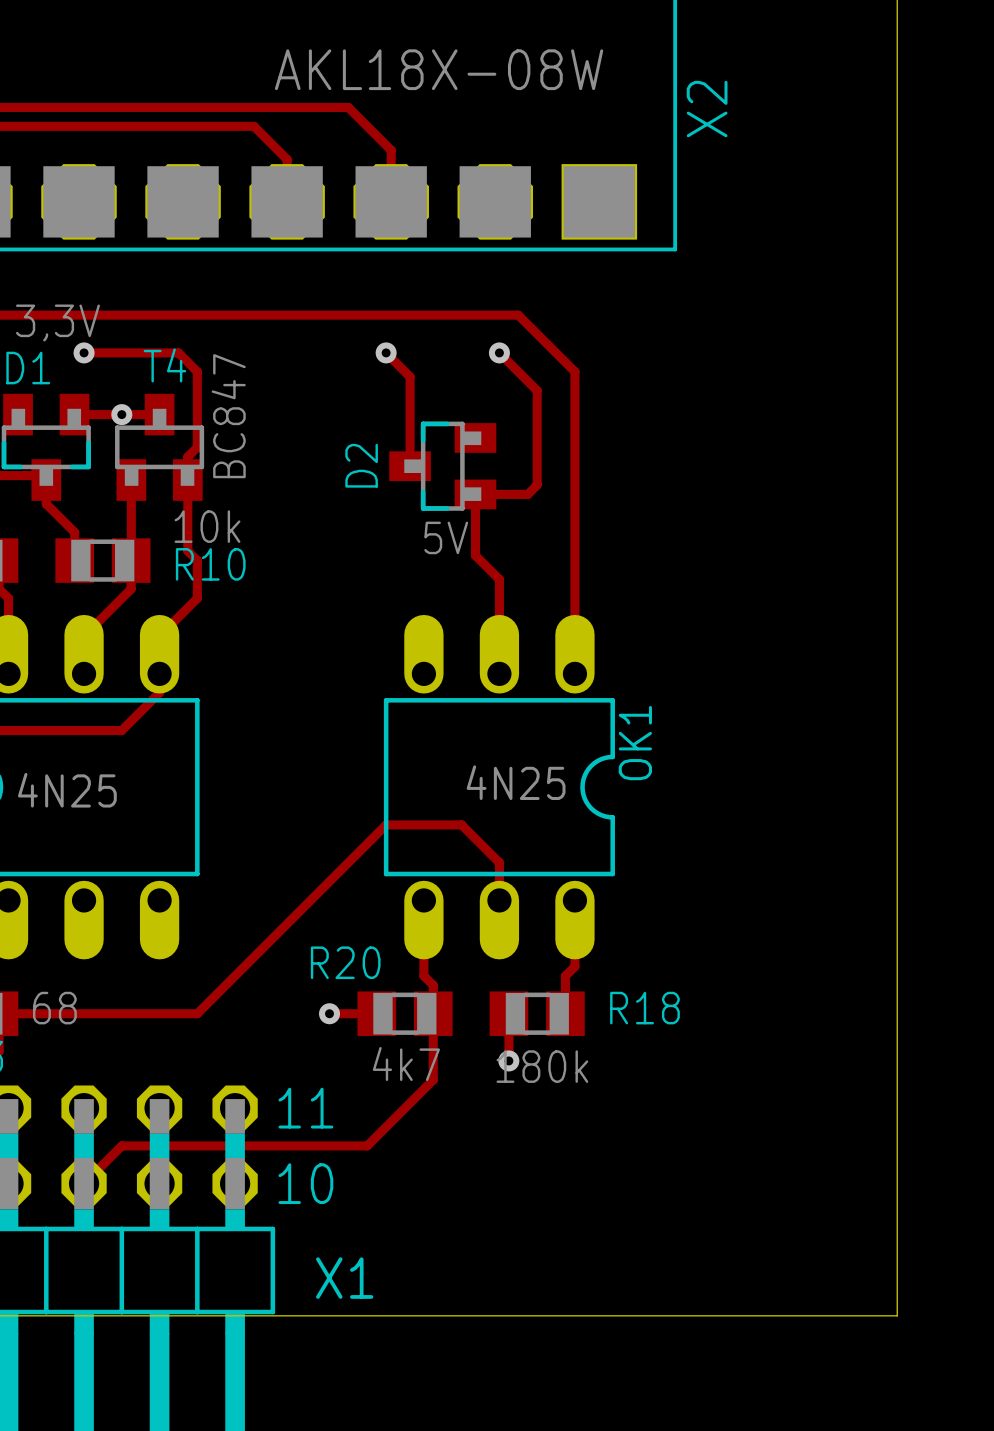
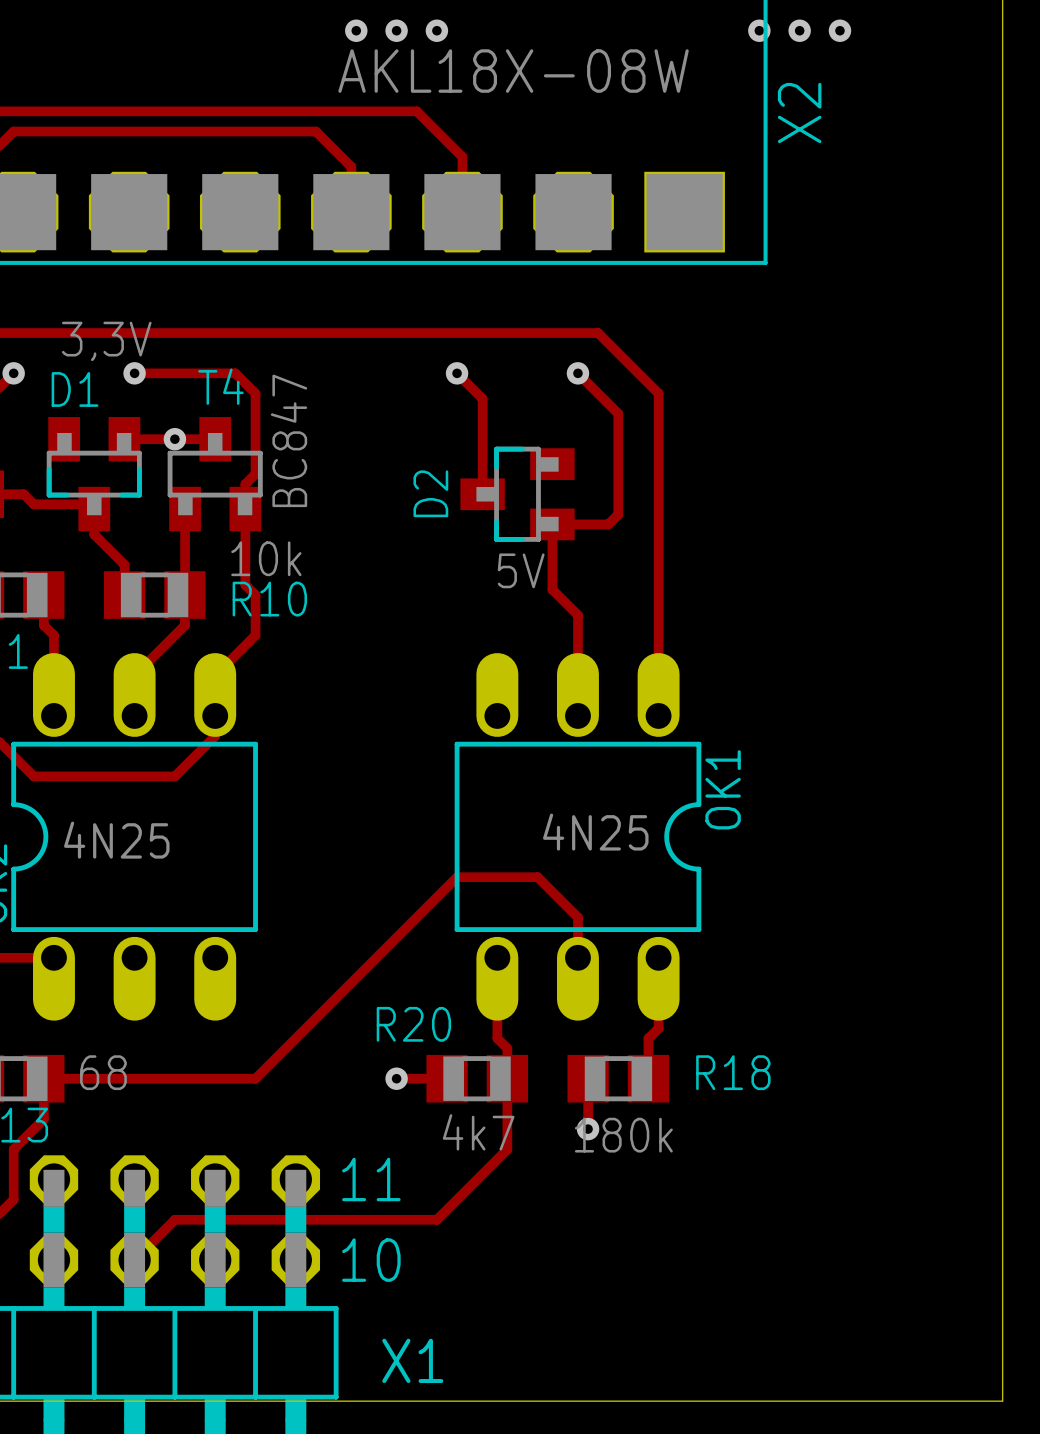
via: none -> (356, 30)
via: none -> (396, 30)
via: none -> (436, 30)
via: none -> (759, 30)
via: none -> (799, 30)
via: none -> (839, 30)

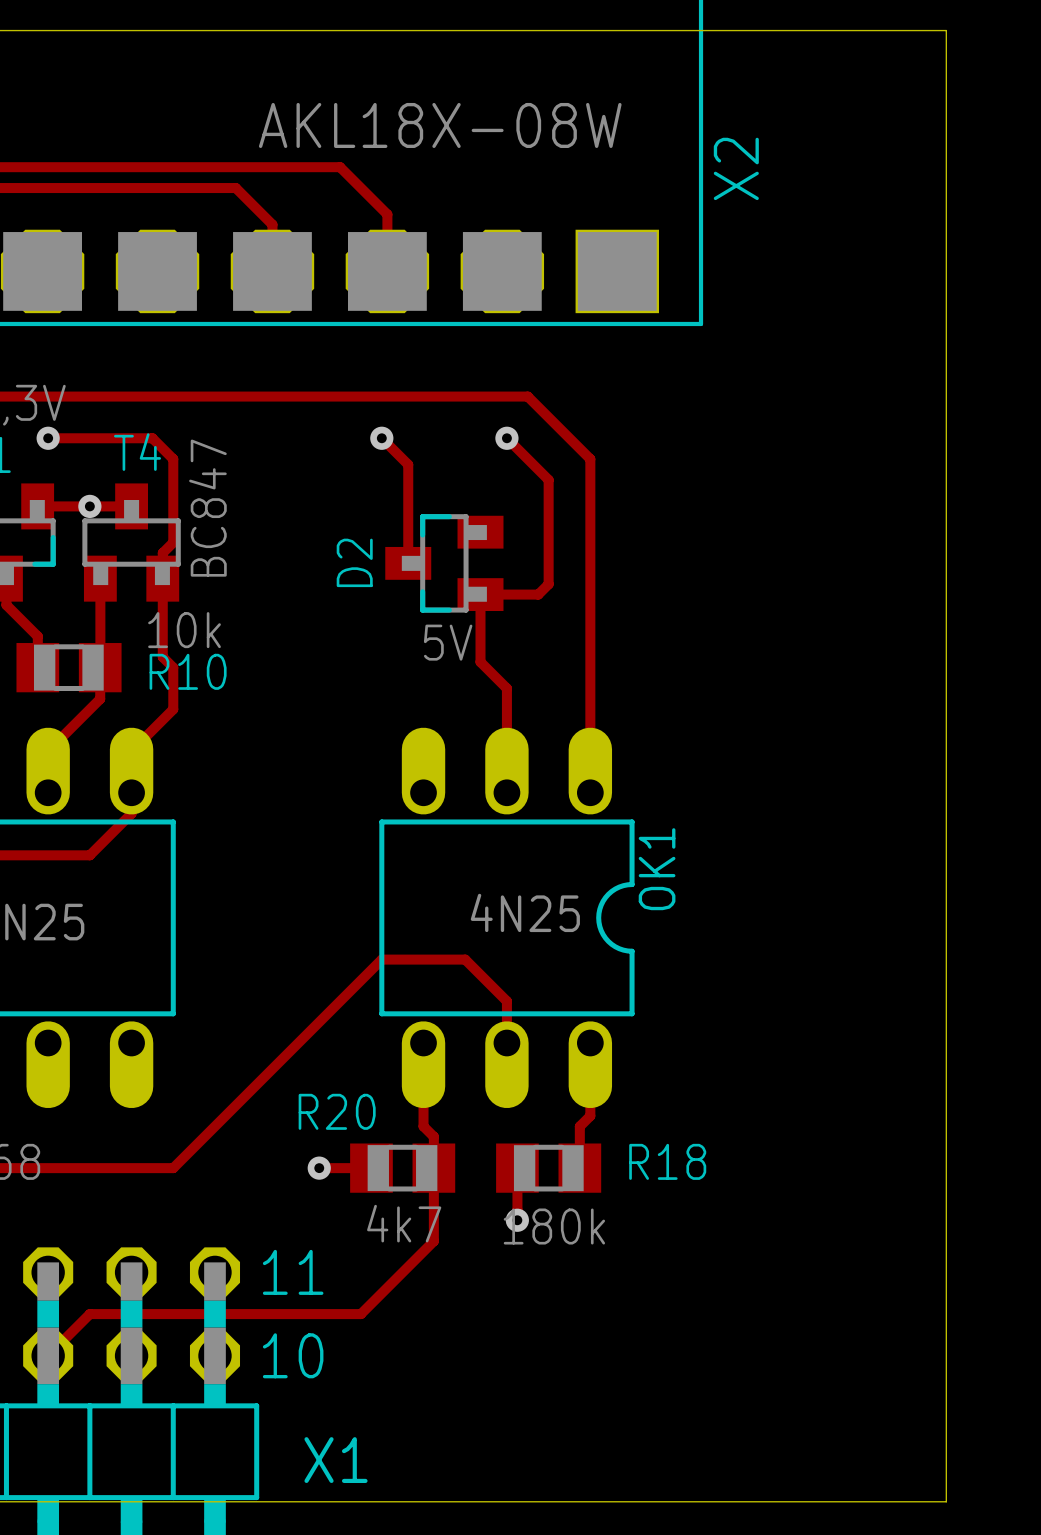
via: (356, 30) -> none
via: (396, 30) -> none
via: (436, 30) -> none
via: (759, 30) -> none
via: (799, 30) -> none
via: (839, 30) -> none

